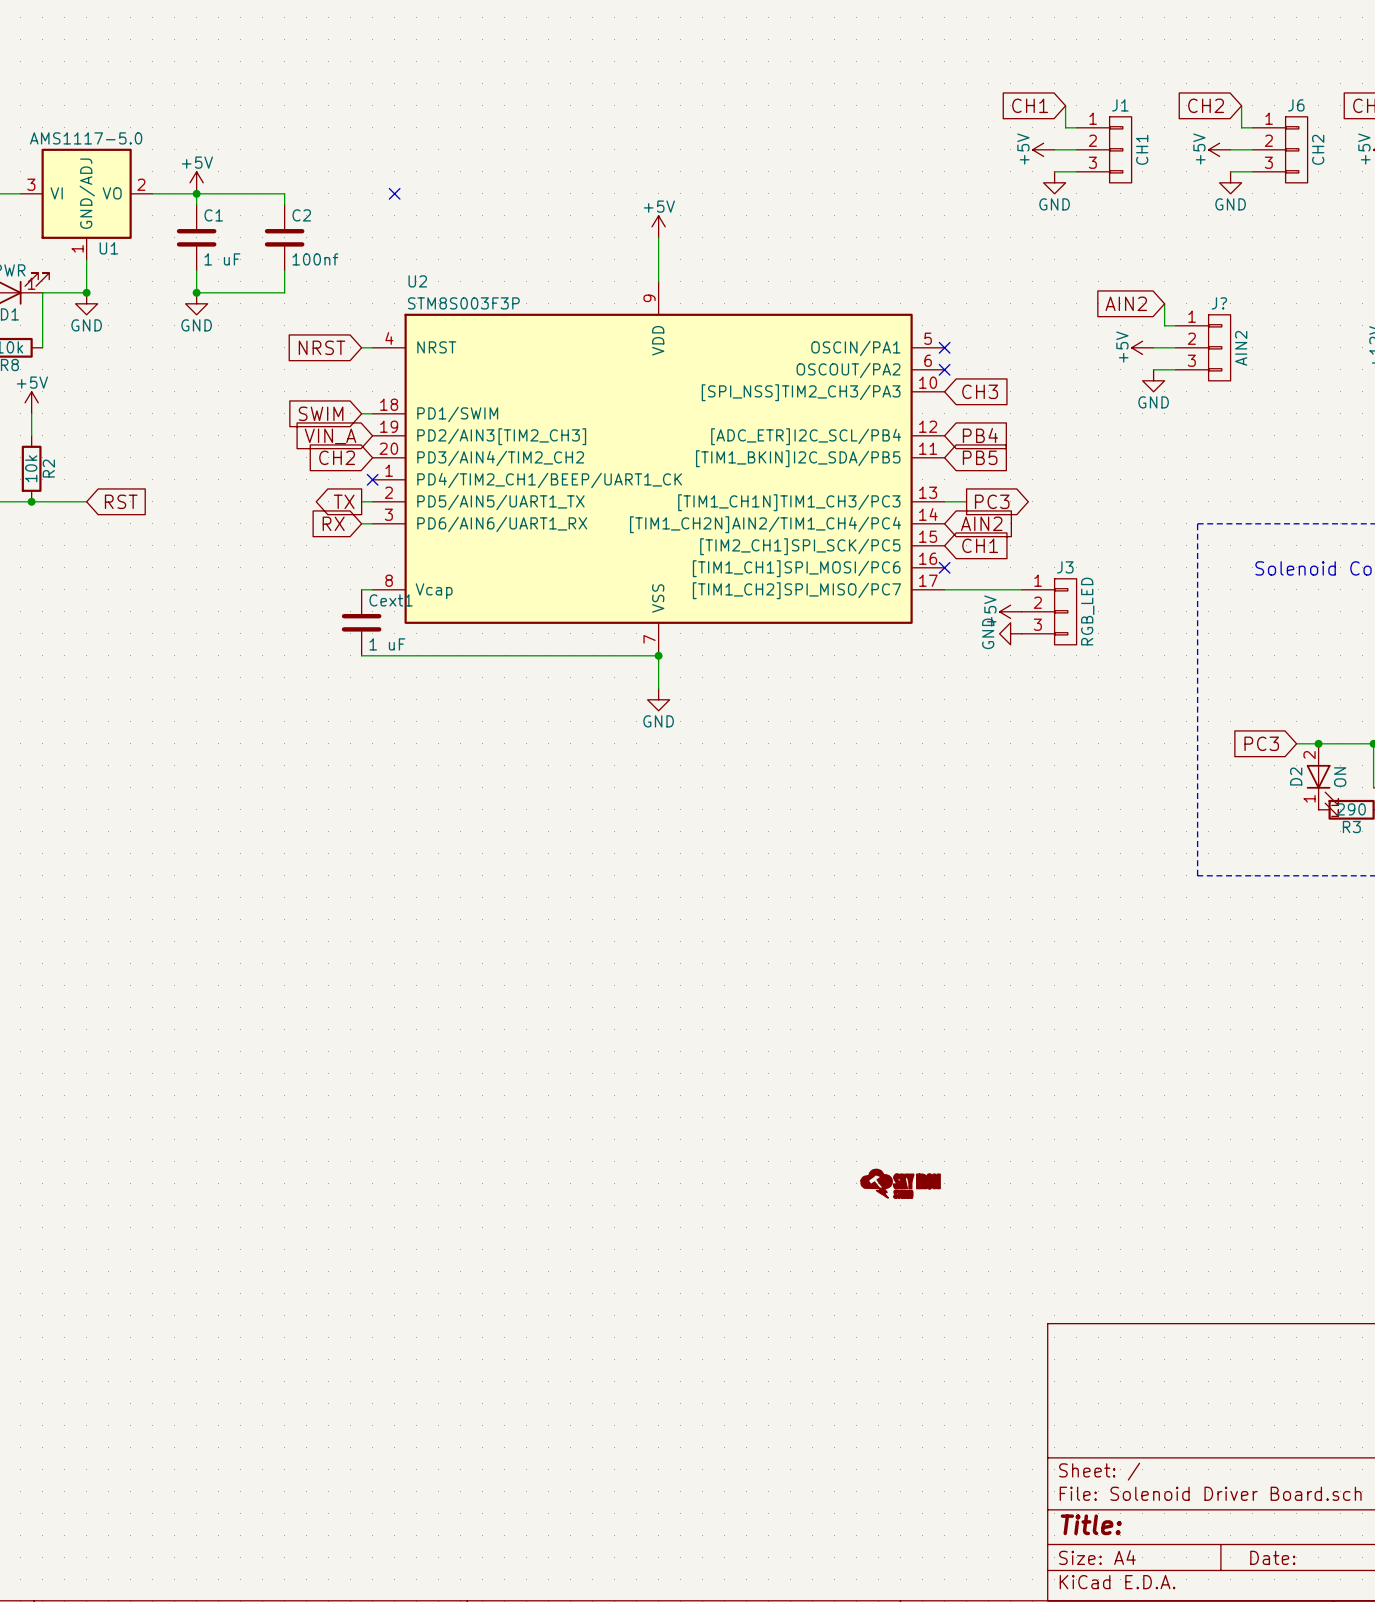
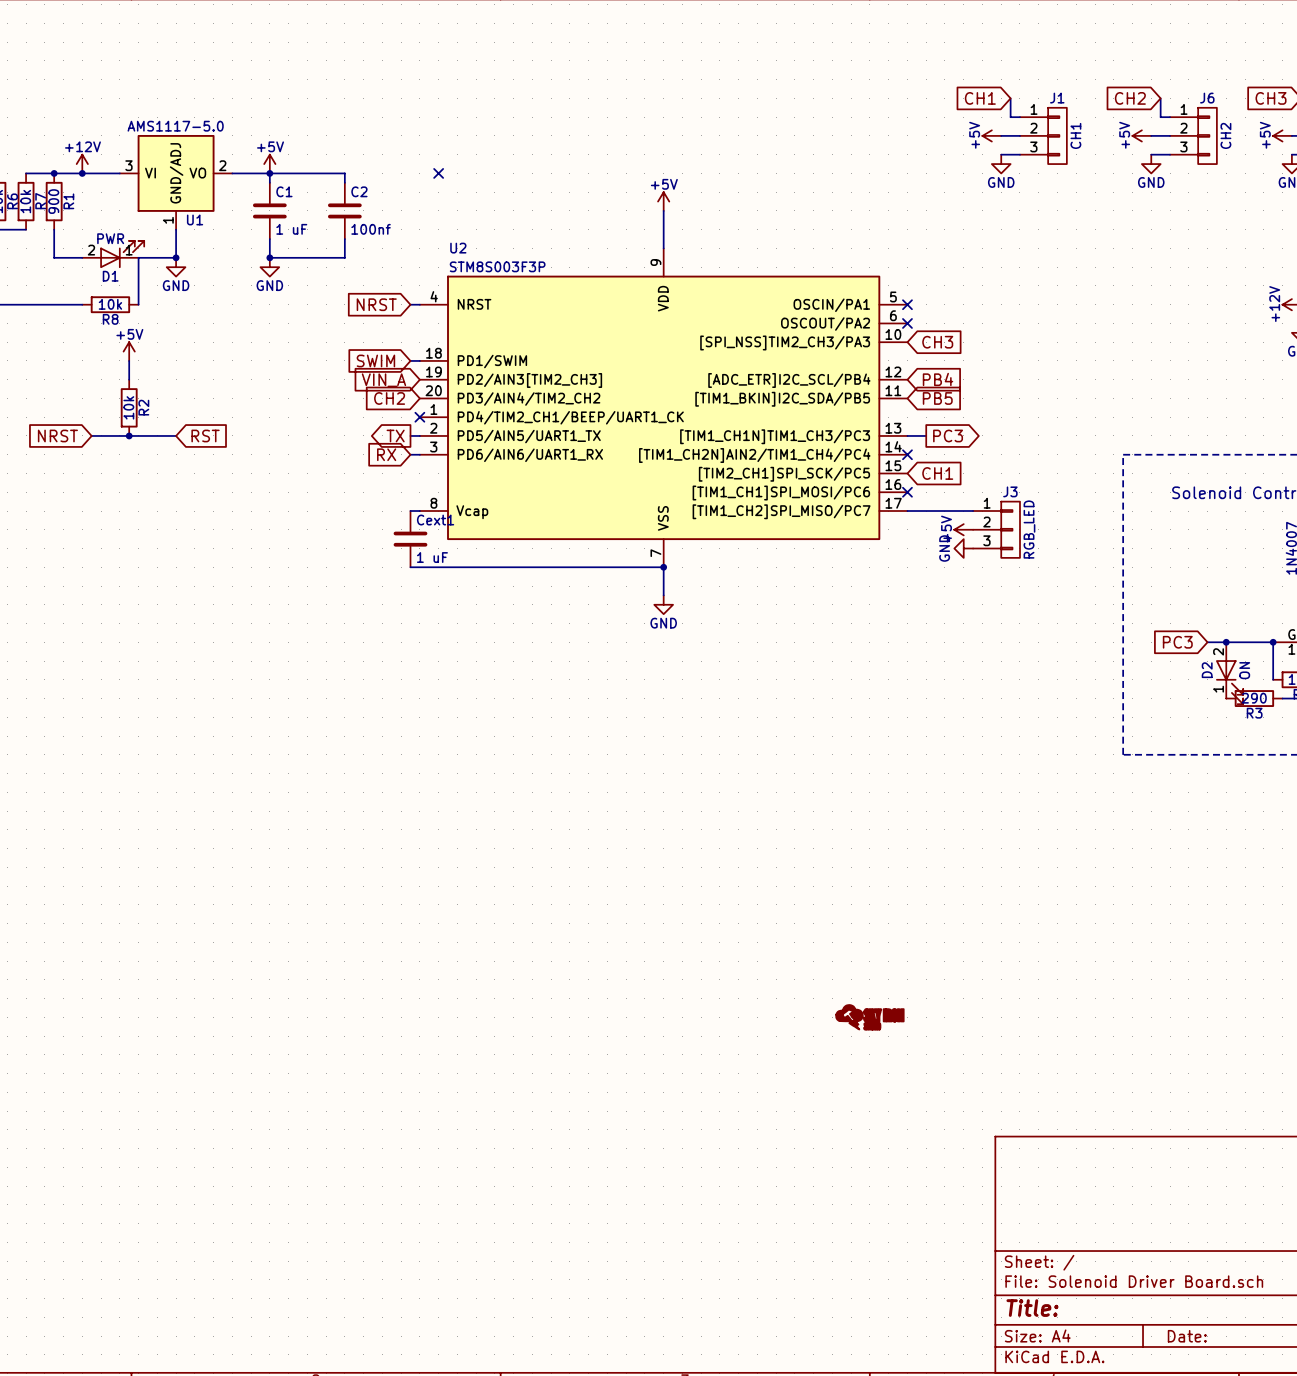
global label: AIN2 (1126, 303) -> none
wire: (1164, 303) (1164, 325) (1175, 325) -> none
power symbol: +5V (1142, 347) -> none
wire: (1153, 347) (1175, 347) -> none
J?: AIN2 (1203, 347) -> none
wire: (1153, 369) (1175, 369) -> none
power symbol: GND (1153, 380) -> none
no-connect mark: none -> (907, 454)
global label: AIN2 (981, 523) -> none

